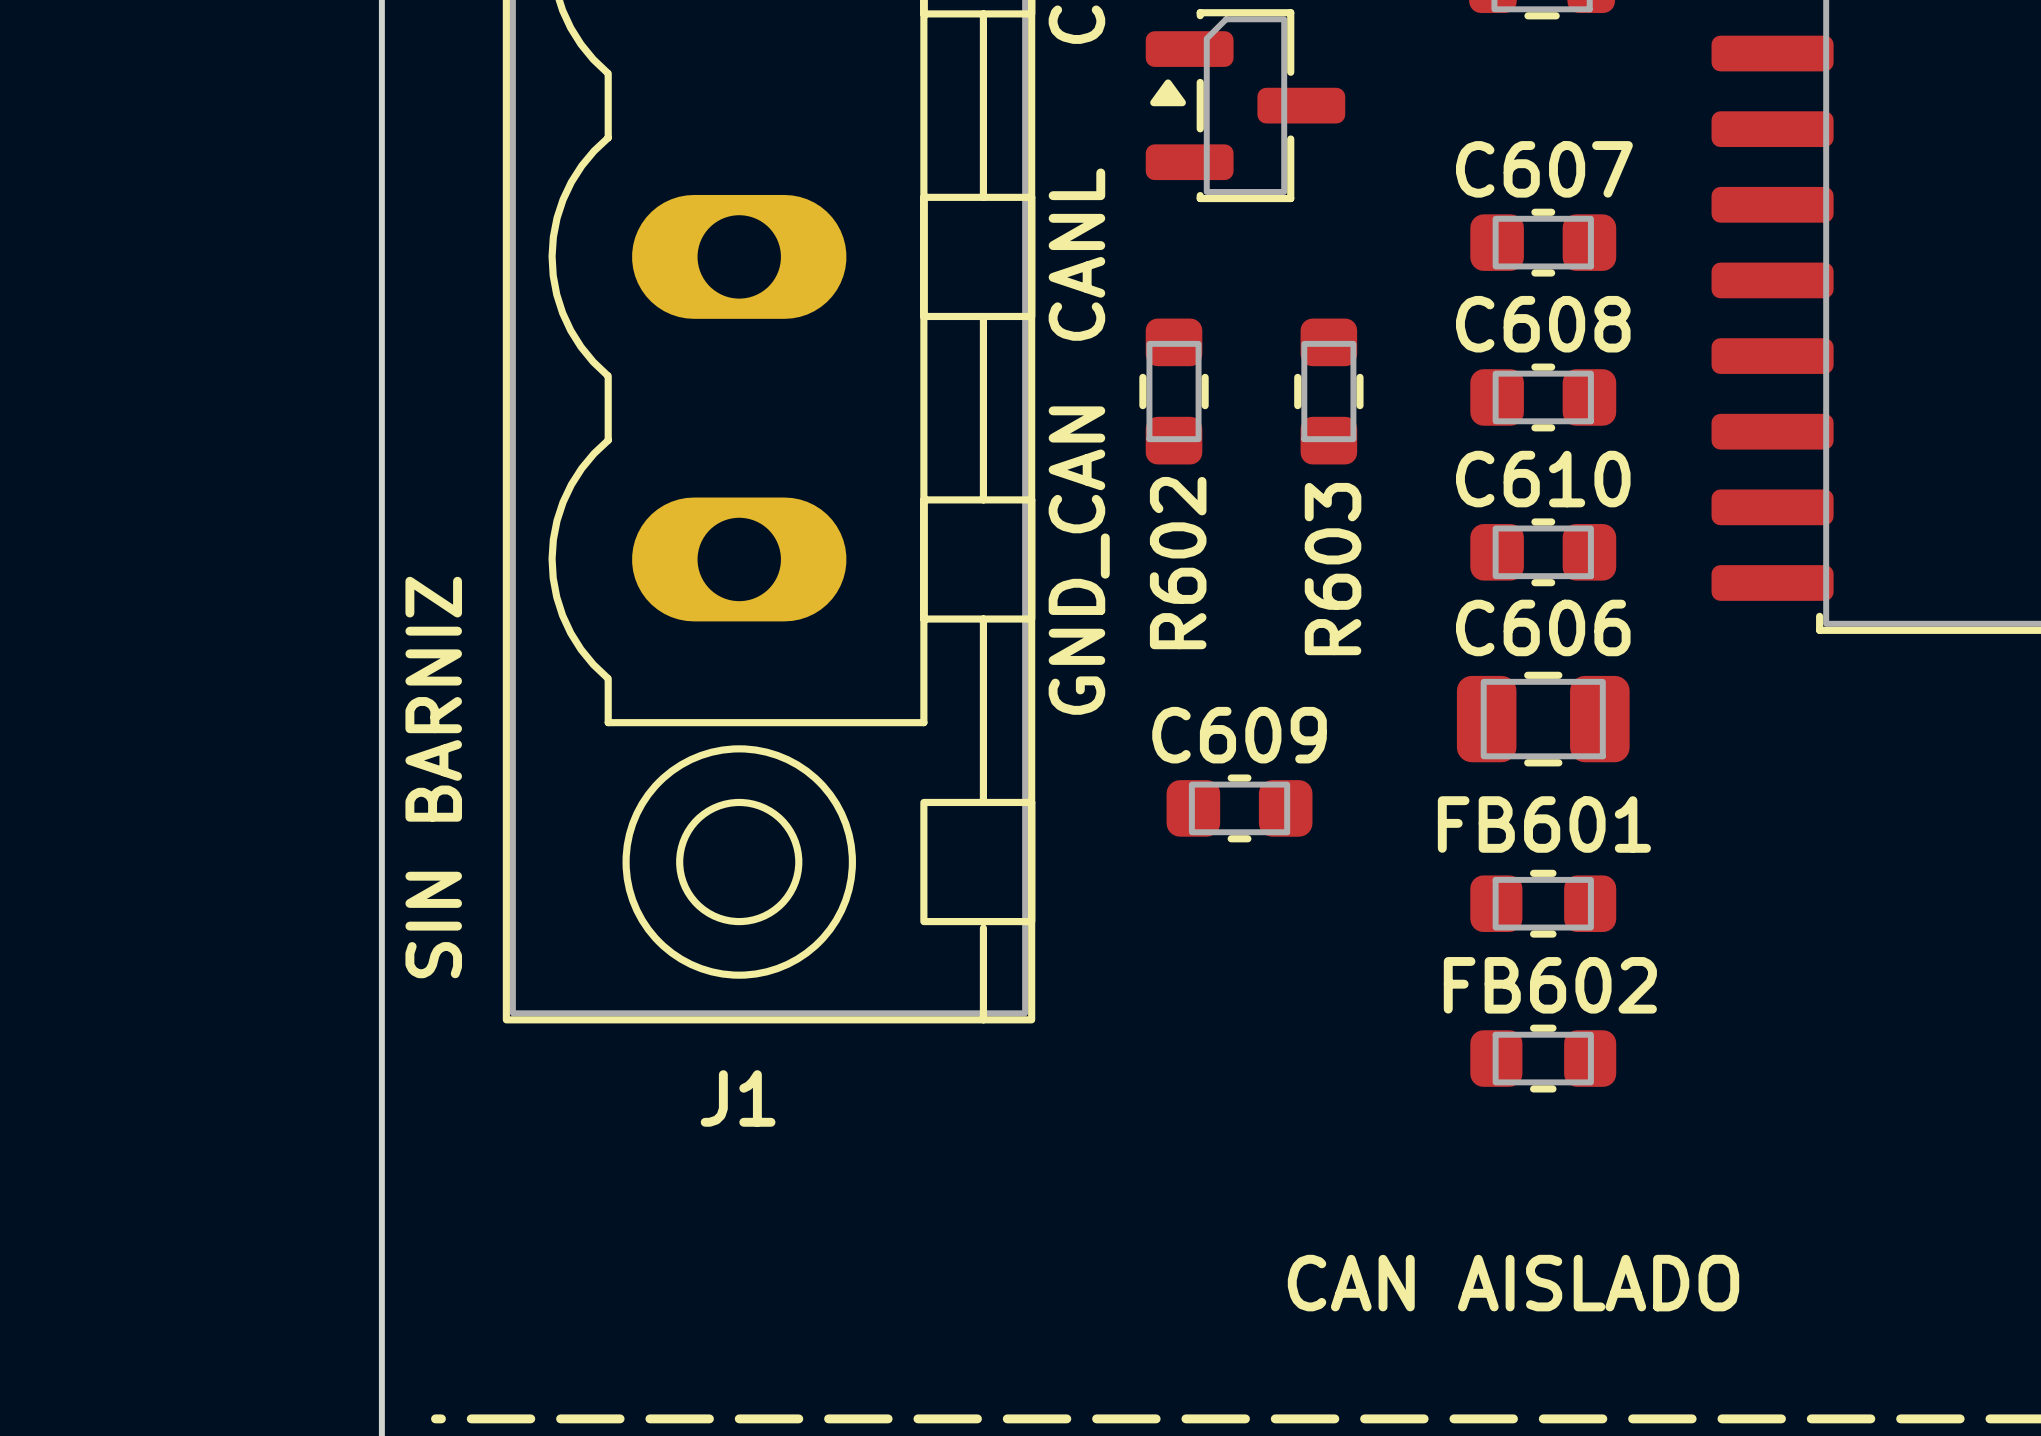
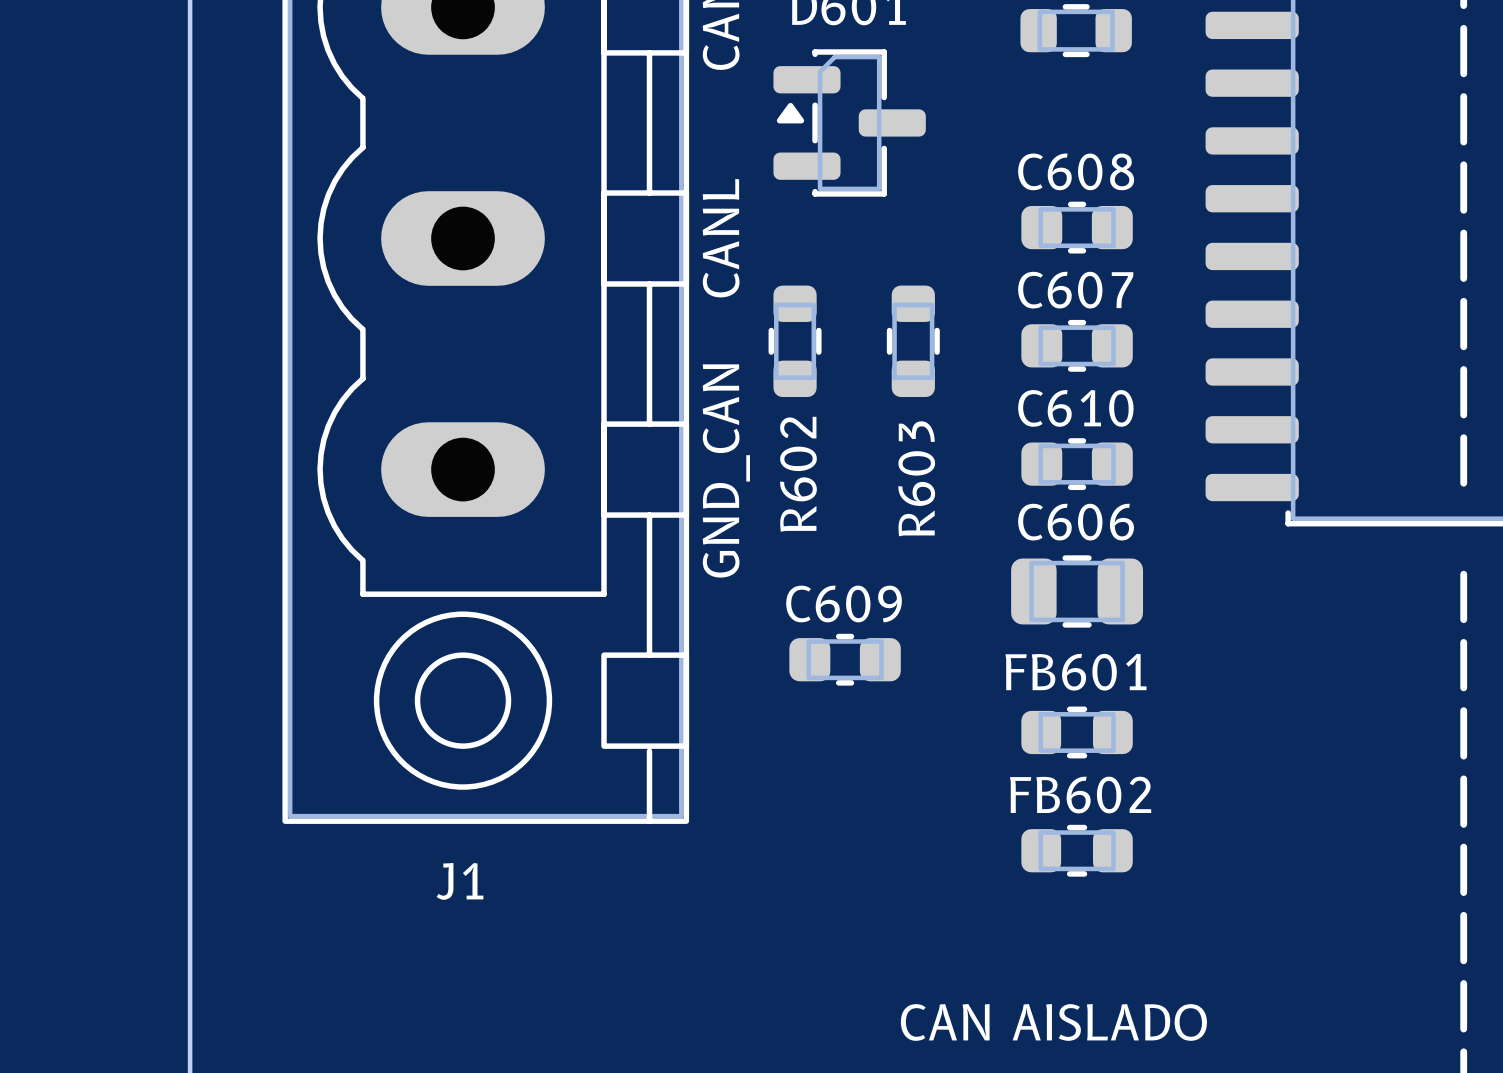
C607 name: C607 (1544, 169) -> C608 (1076, 171)
C608 name: C608 (1543, 324) -> C607 (1075, 290)
text: SIN BARNIZ (433, 777) -> none

